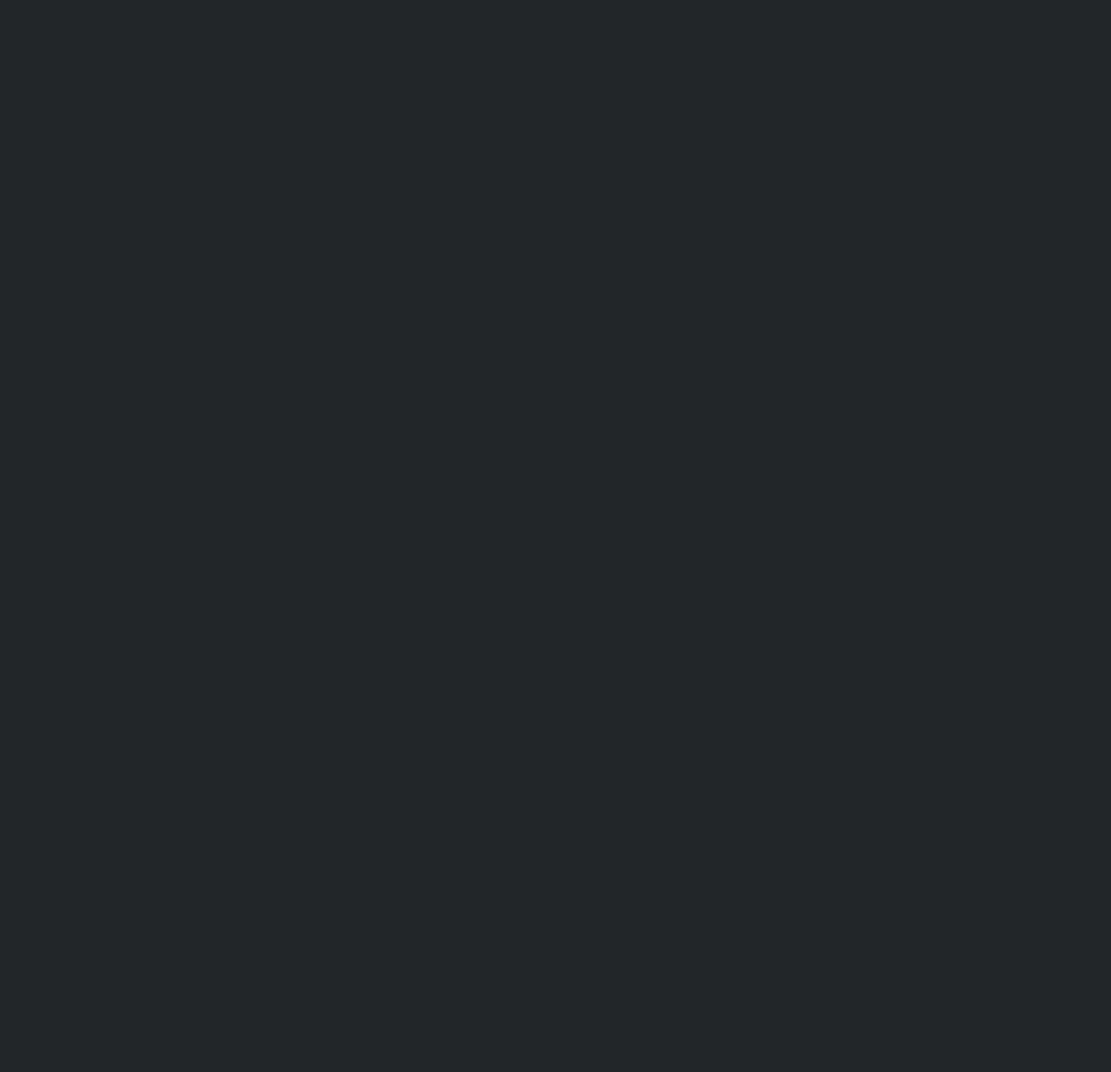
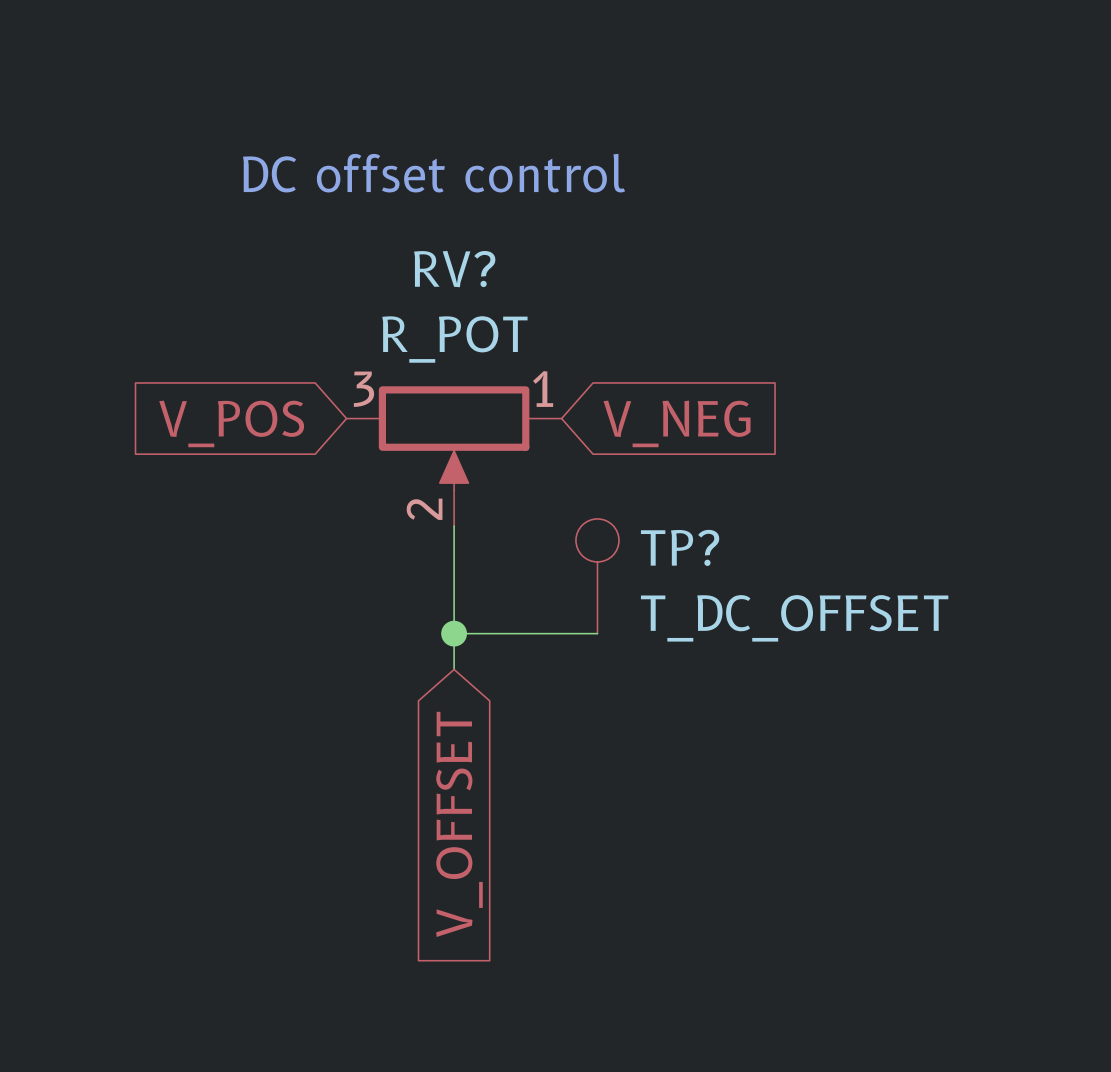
text: none -> DC offset control (434, 173)
global label: none -> V_POS (231, 423)
global label: none -> V_NEG (677, 423)
RV?: none -> R_POT (454, 456)
wire: none -> (454, 526) (454, 669)
TP?: none -> T_DC_OFFSET (597, 576)
wire: none -> (454, 633) (597, 633)
junction: none -> (454, 633)
global label: none -> V_OFFSET (459, 824)

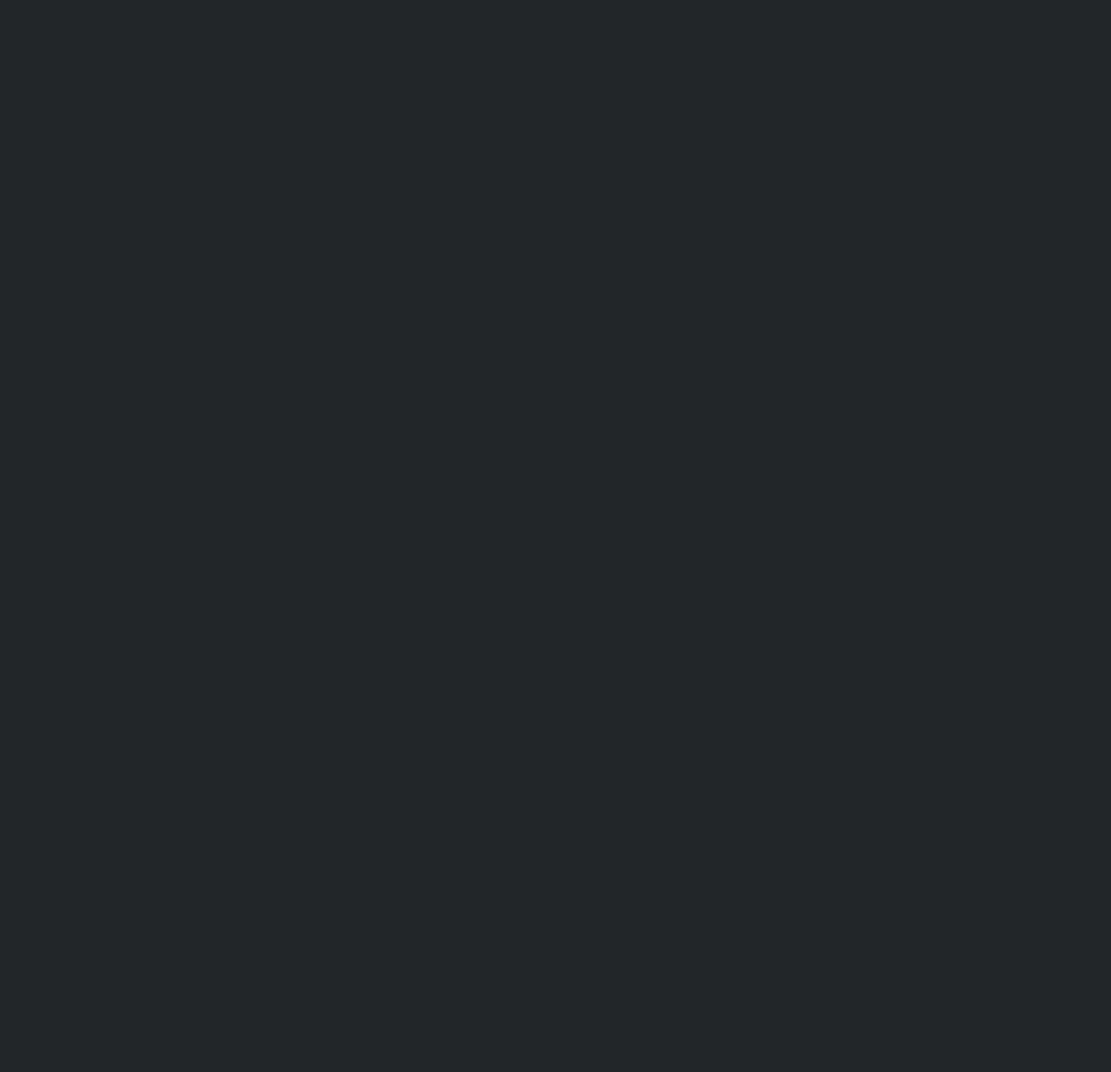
text: DC offset control (434, 173) -> none
global label: V_POS (231, 423) -> none
global label: V_NEG (677, 423) -> none
RV?: R_POT (454, 456) -> none
wire: (454, 526) (454, 669) -> none
TP?: T_DC_OFFSET (597, 576) -> none
wire: (454, 633) (597, 633) -> none
junction: (454, 633) -> none
global label: V_OFFSET (459, 824) -> none

